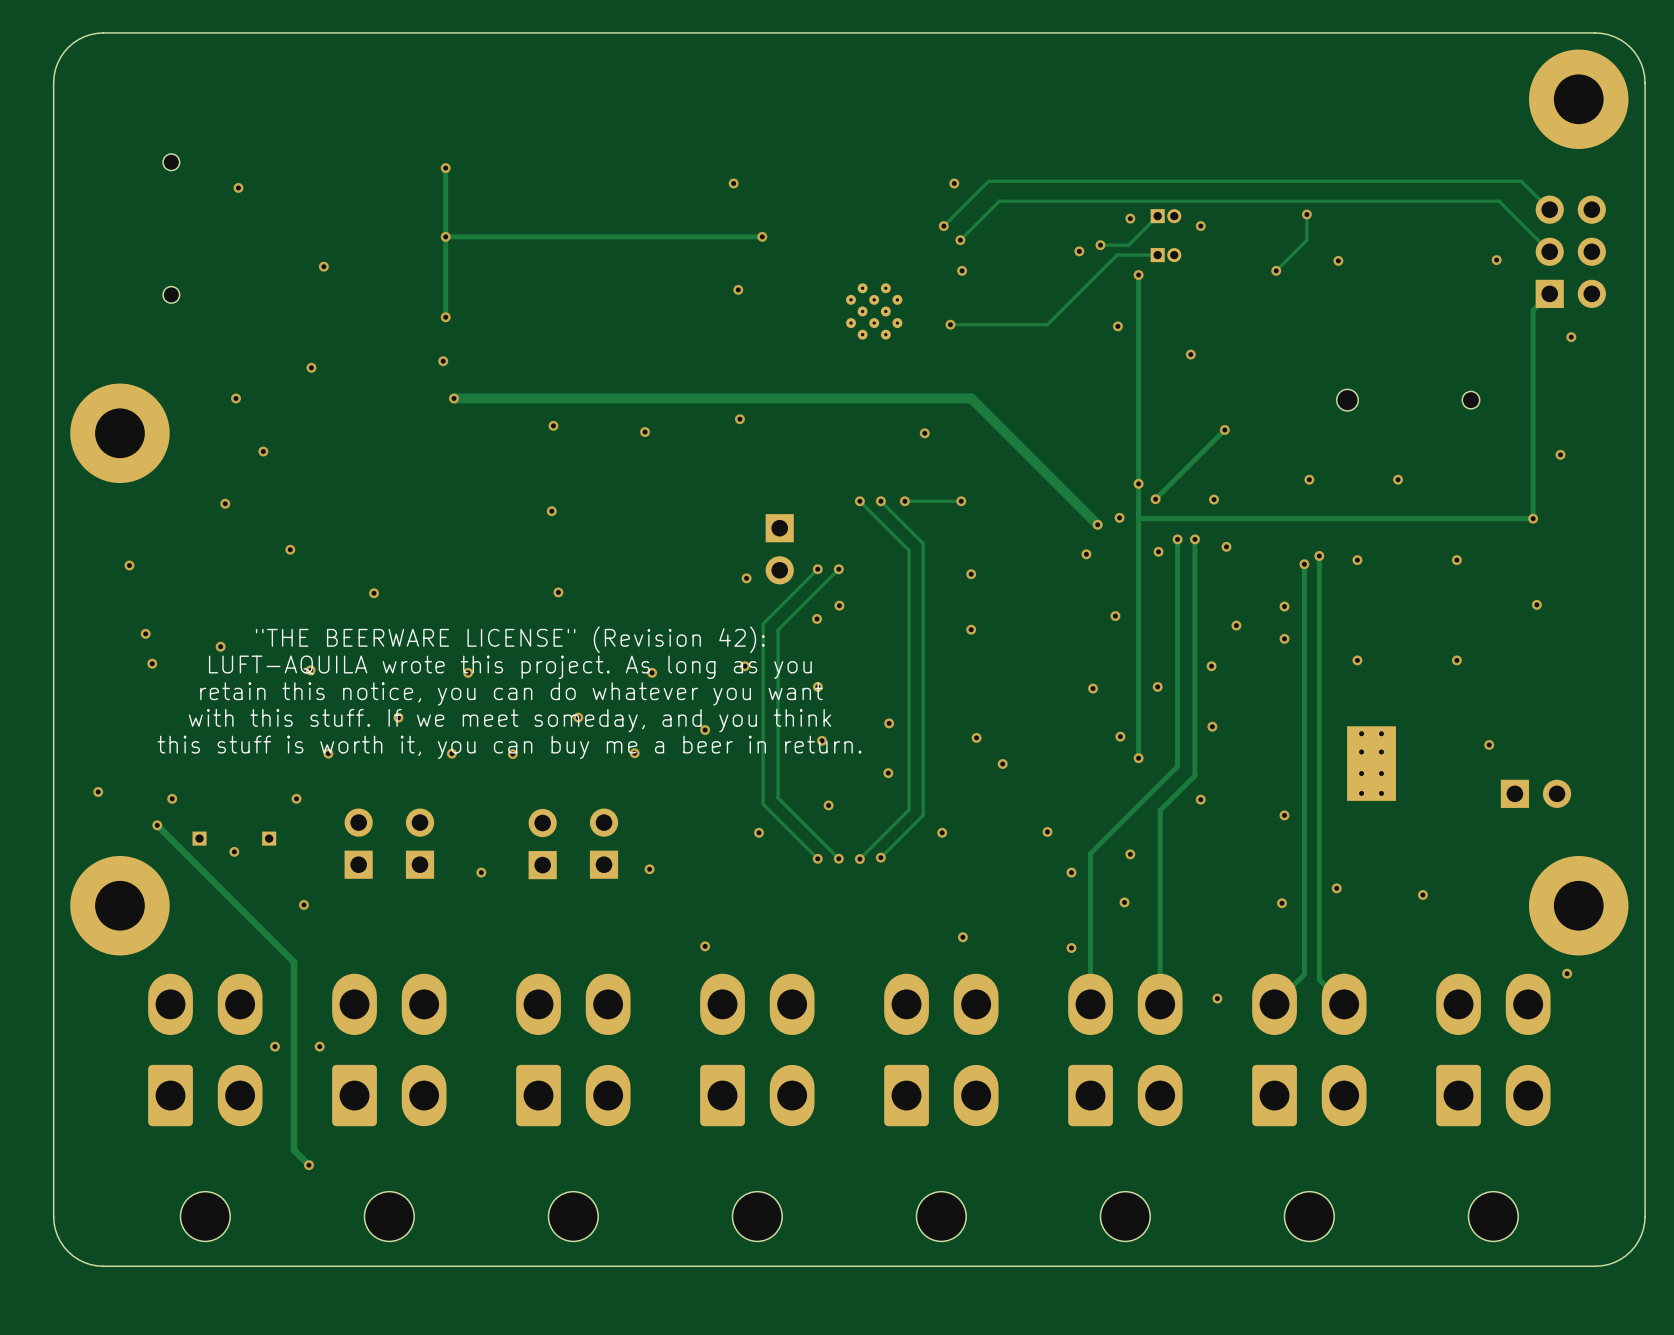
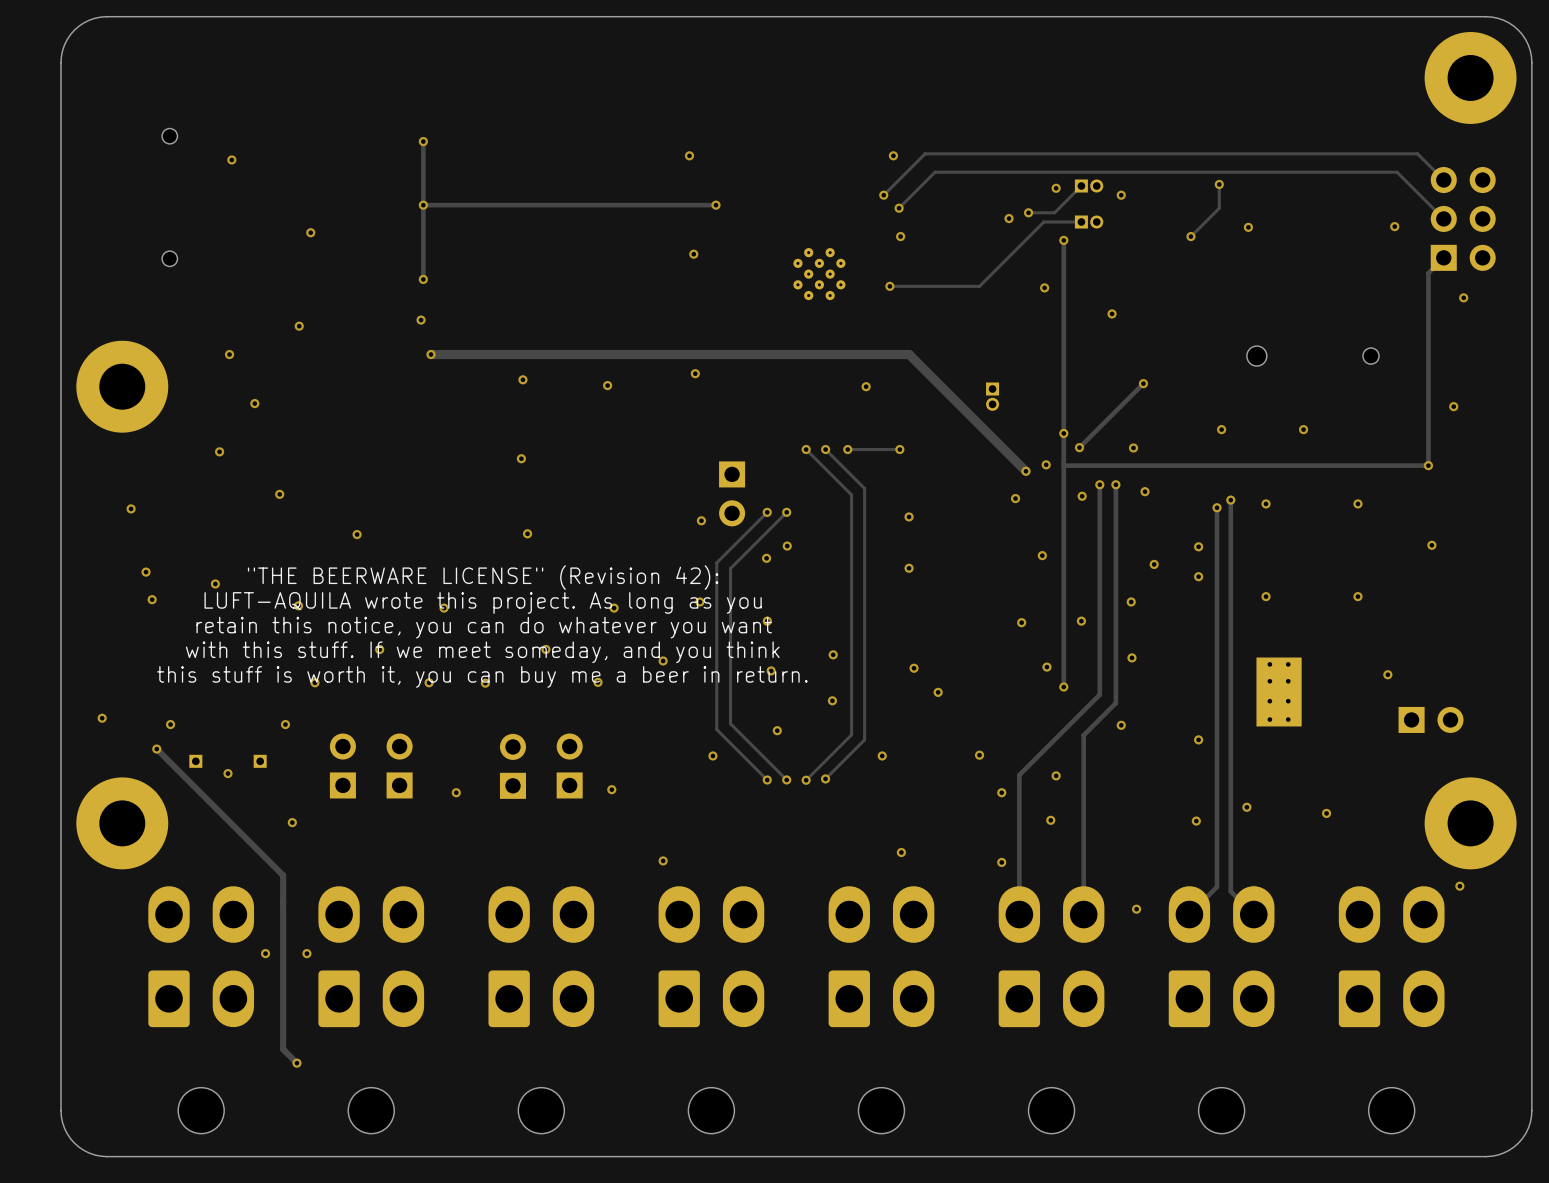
part: none -> (992, 396)

